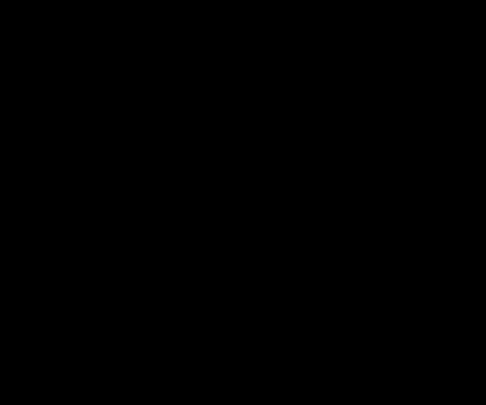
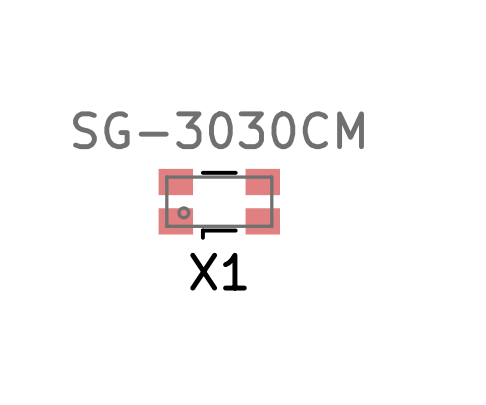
X1: none -> SG-3030CM (219, 204)

